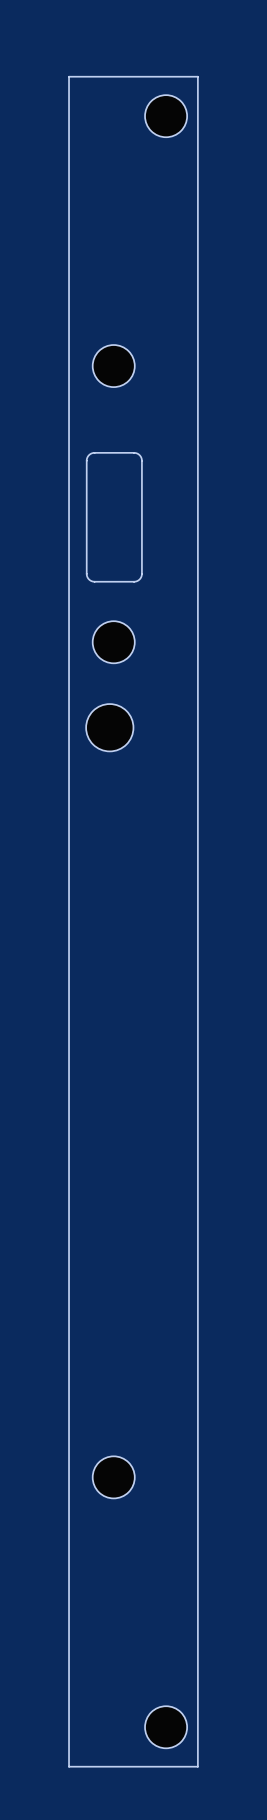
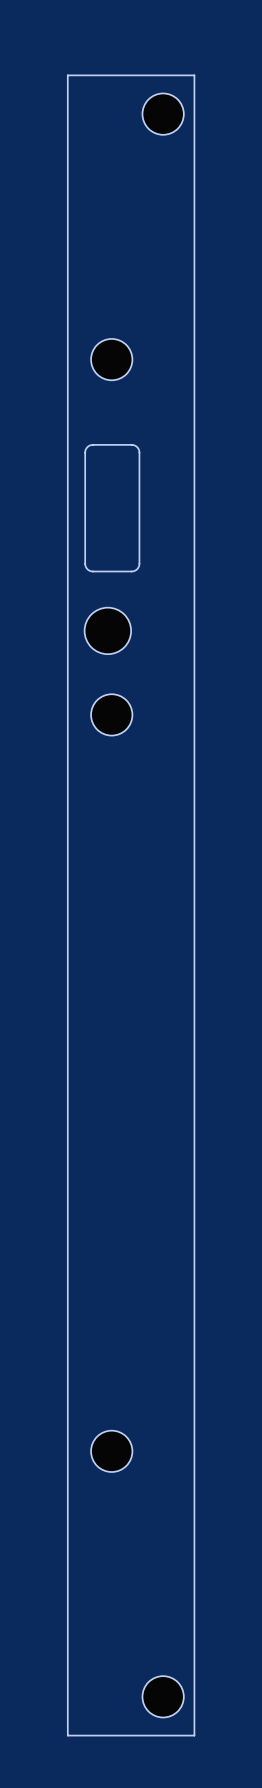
part footprint: [92, 621, 135, 664] -> [84, 607, 132, 655]
part footprint: [86, 704, 134, 752] -> [91, 694, 133, 736]

